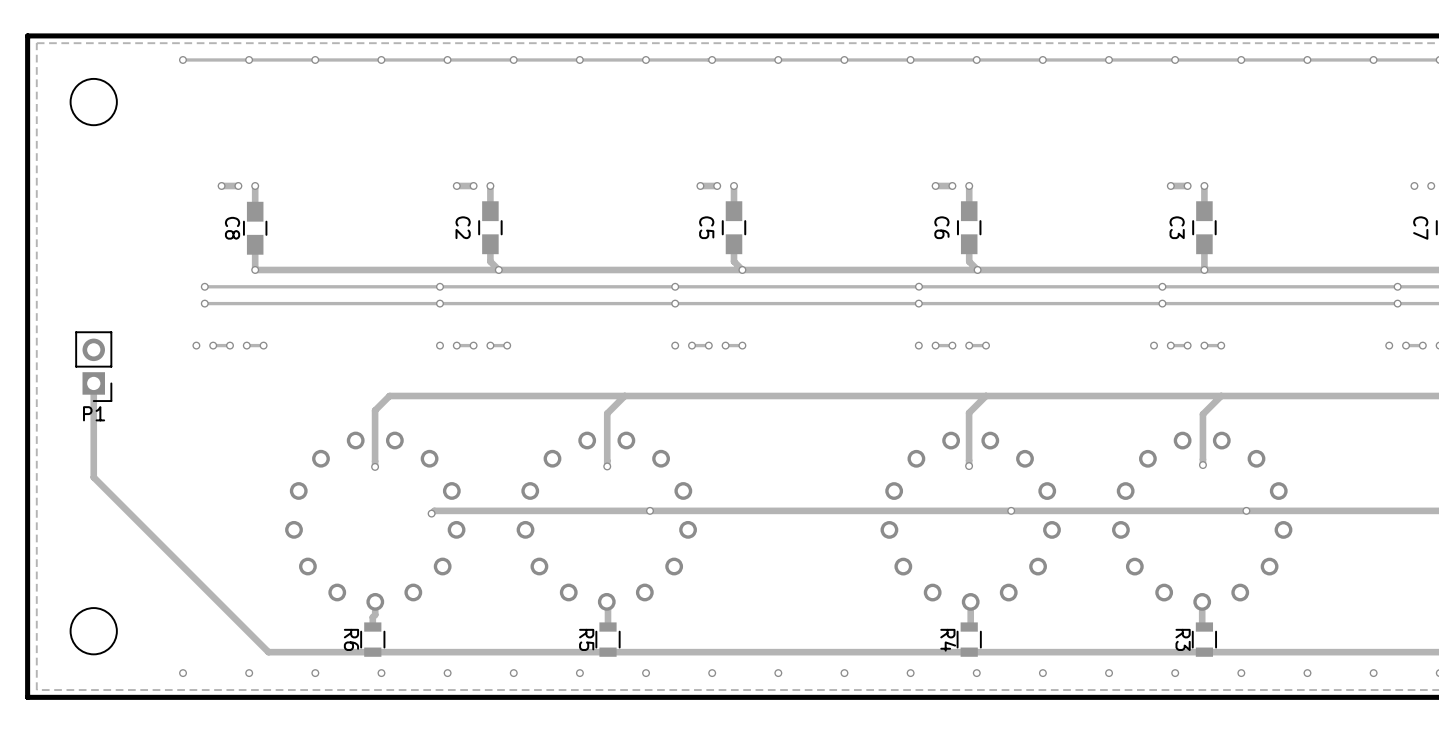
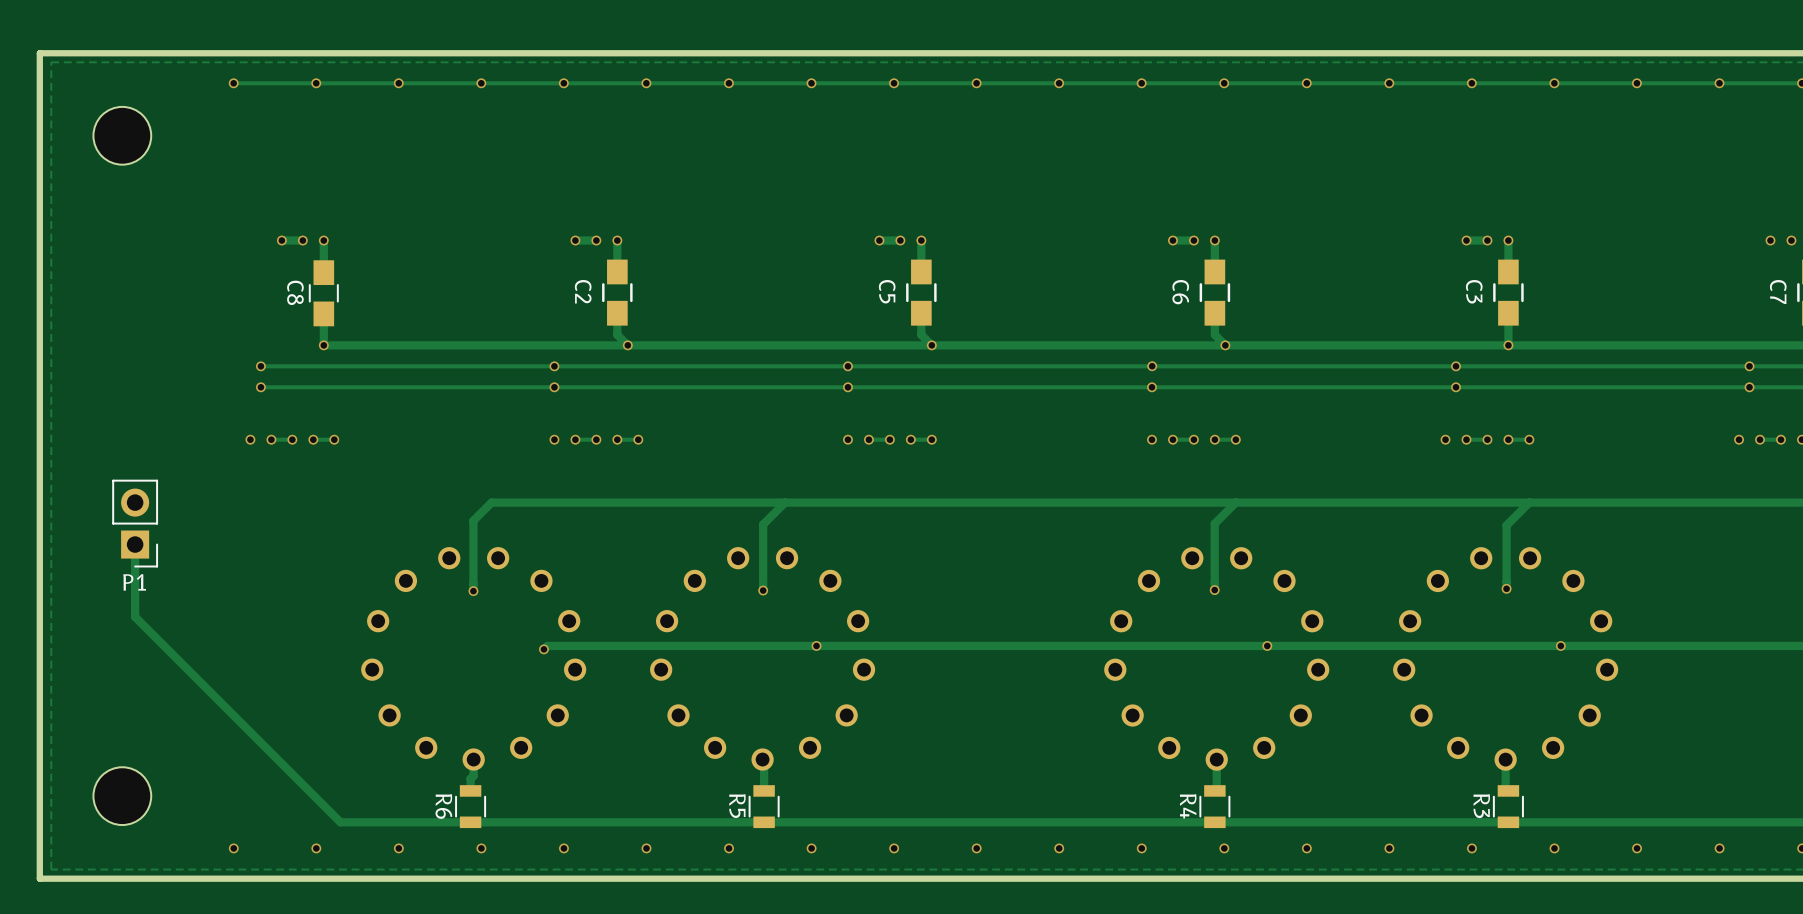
P1 position: (93, 366) -> (135, 523)
track: (93, 383) (93, 477) (103, 487) -> (135, 544) (135, 616)

